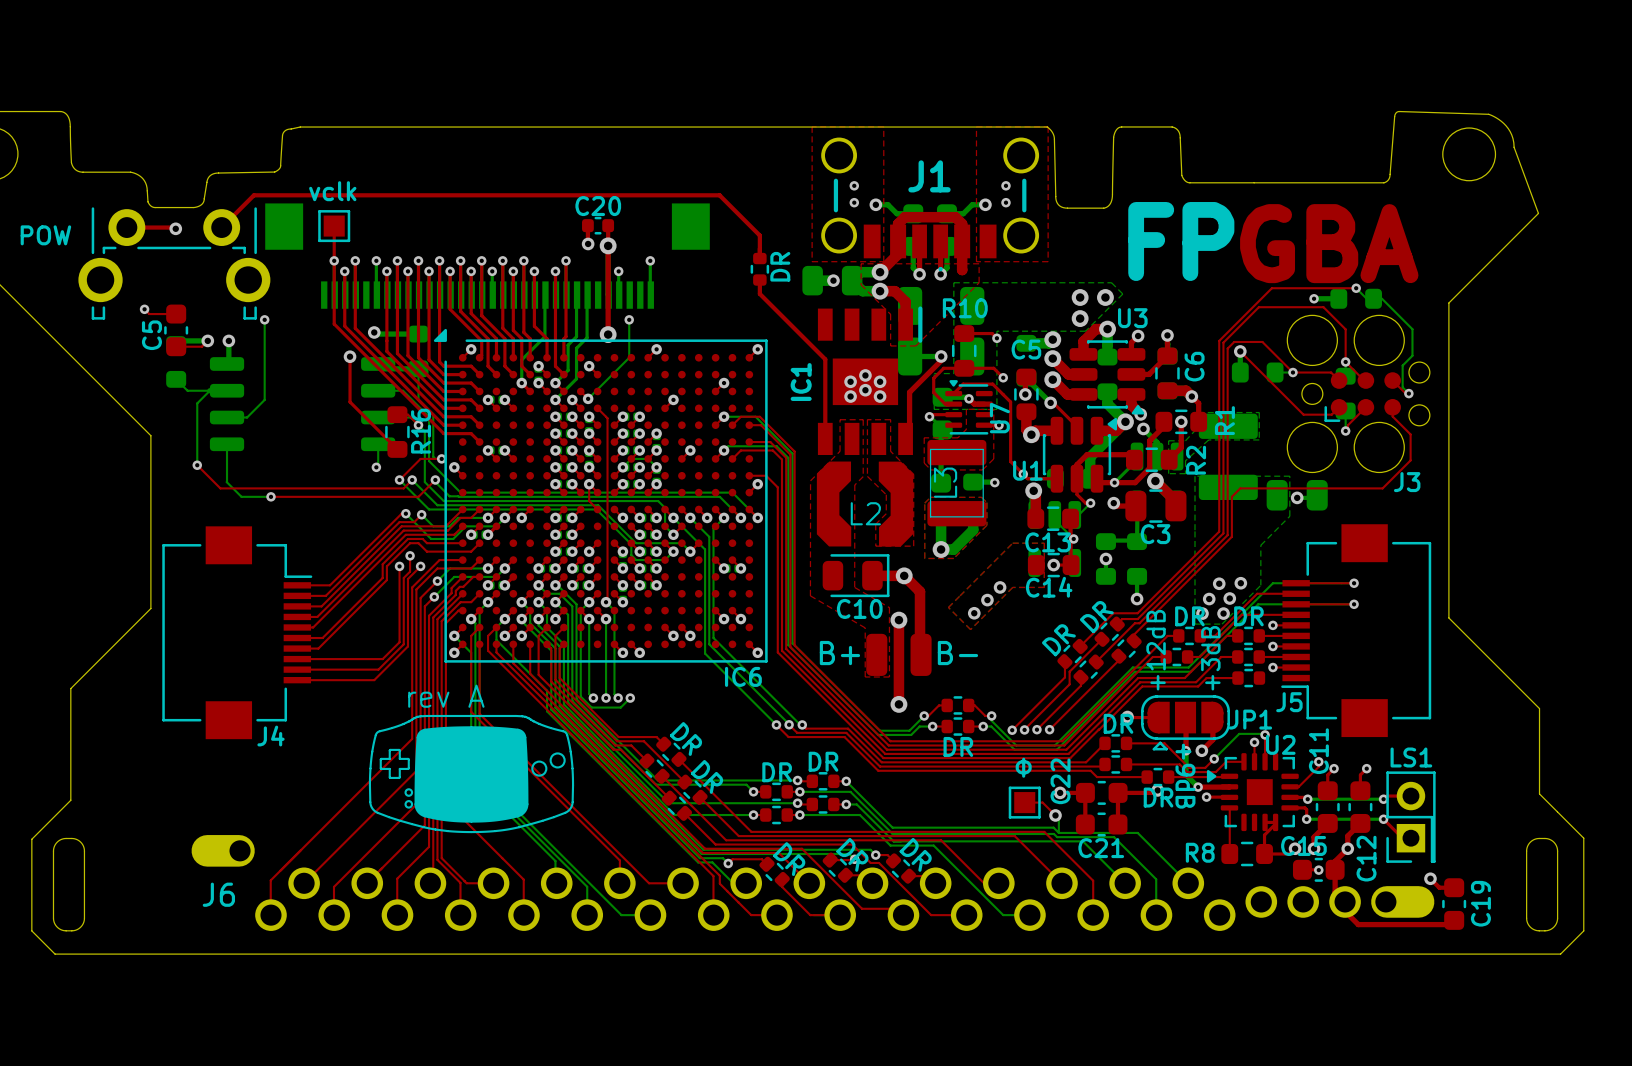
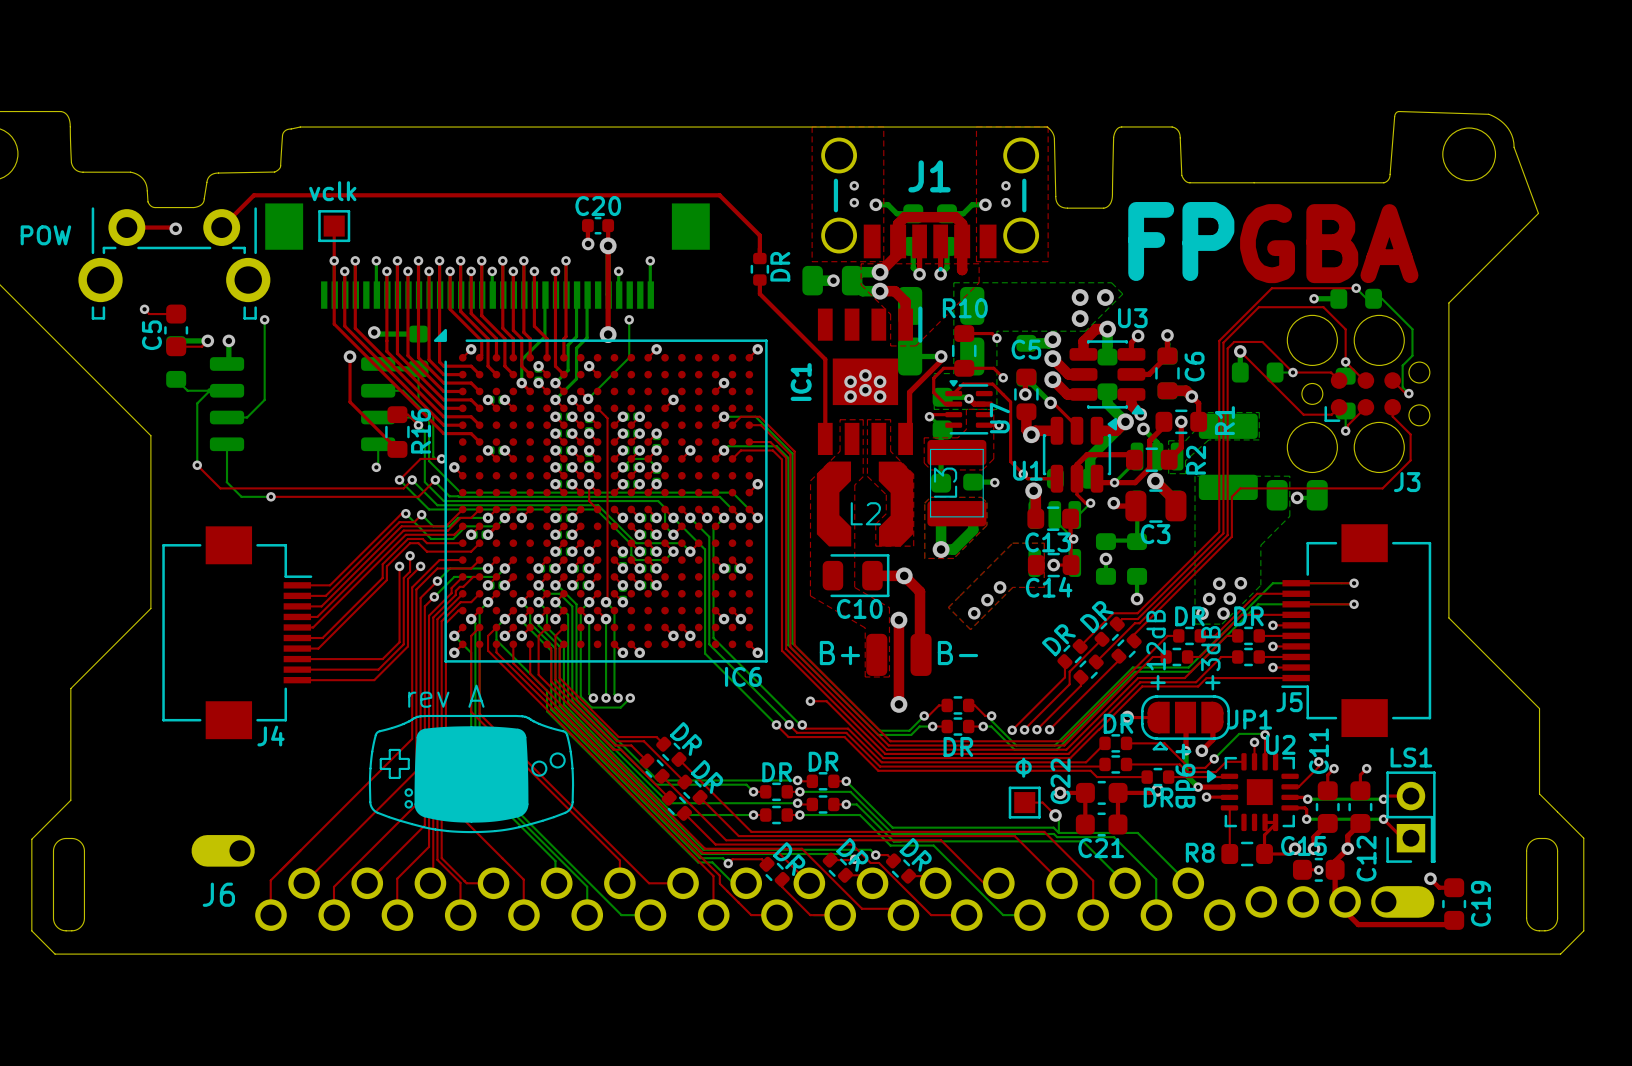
top track: (749, 475) (766, 475) (777, 487) (777, 652) (826, 701) -> (810, 701) (826, 701)
top track: none -> (1237, 678) (1296, 678)
part: (1248, 678) -> none
via: none -> (810, 701)

